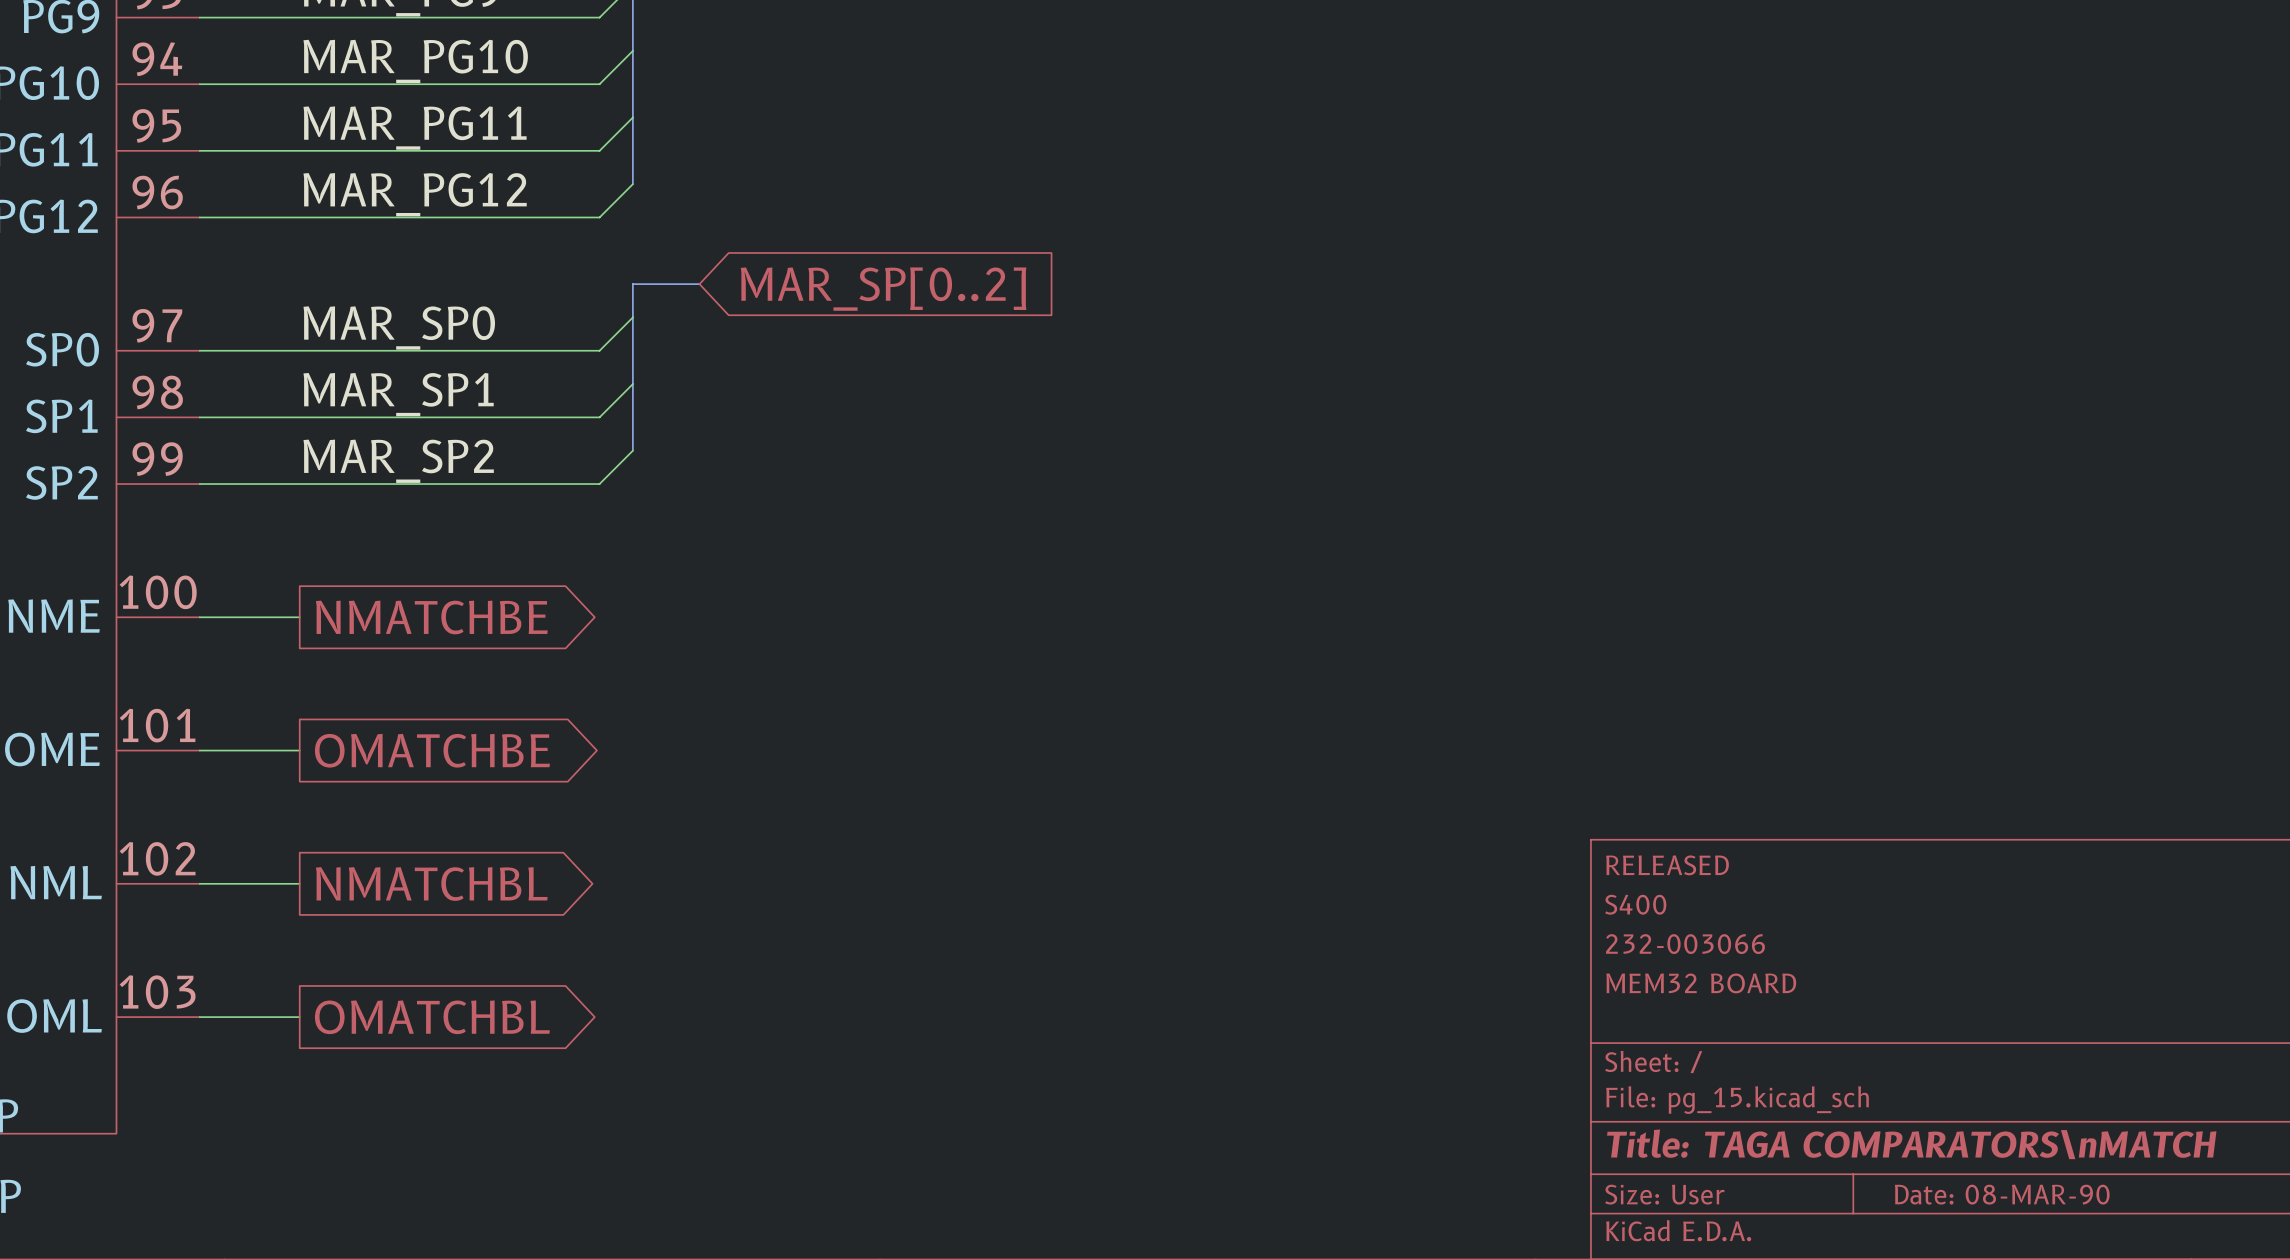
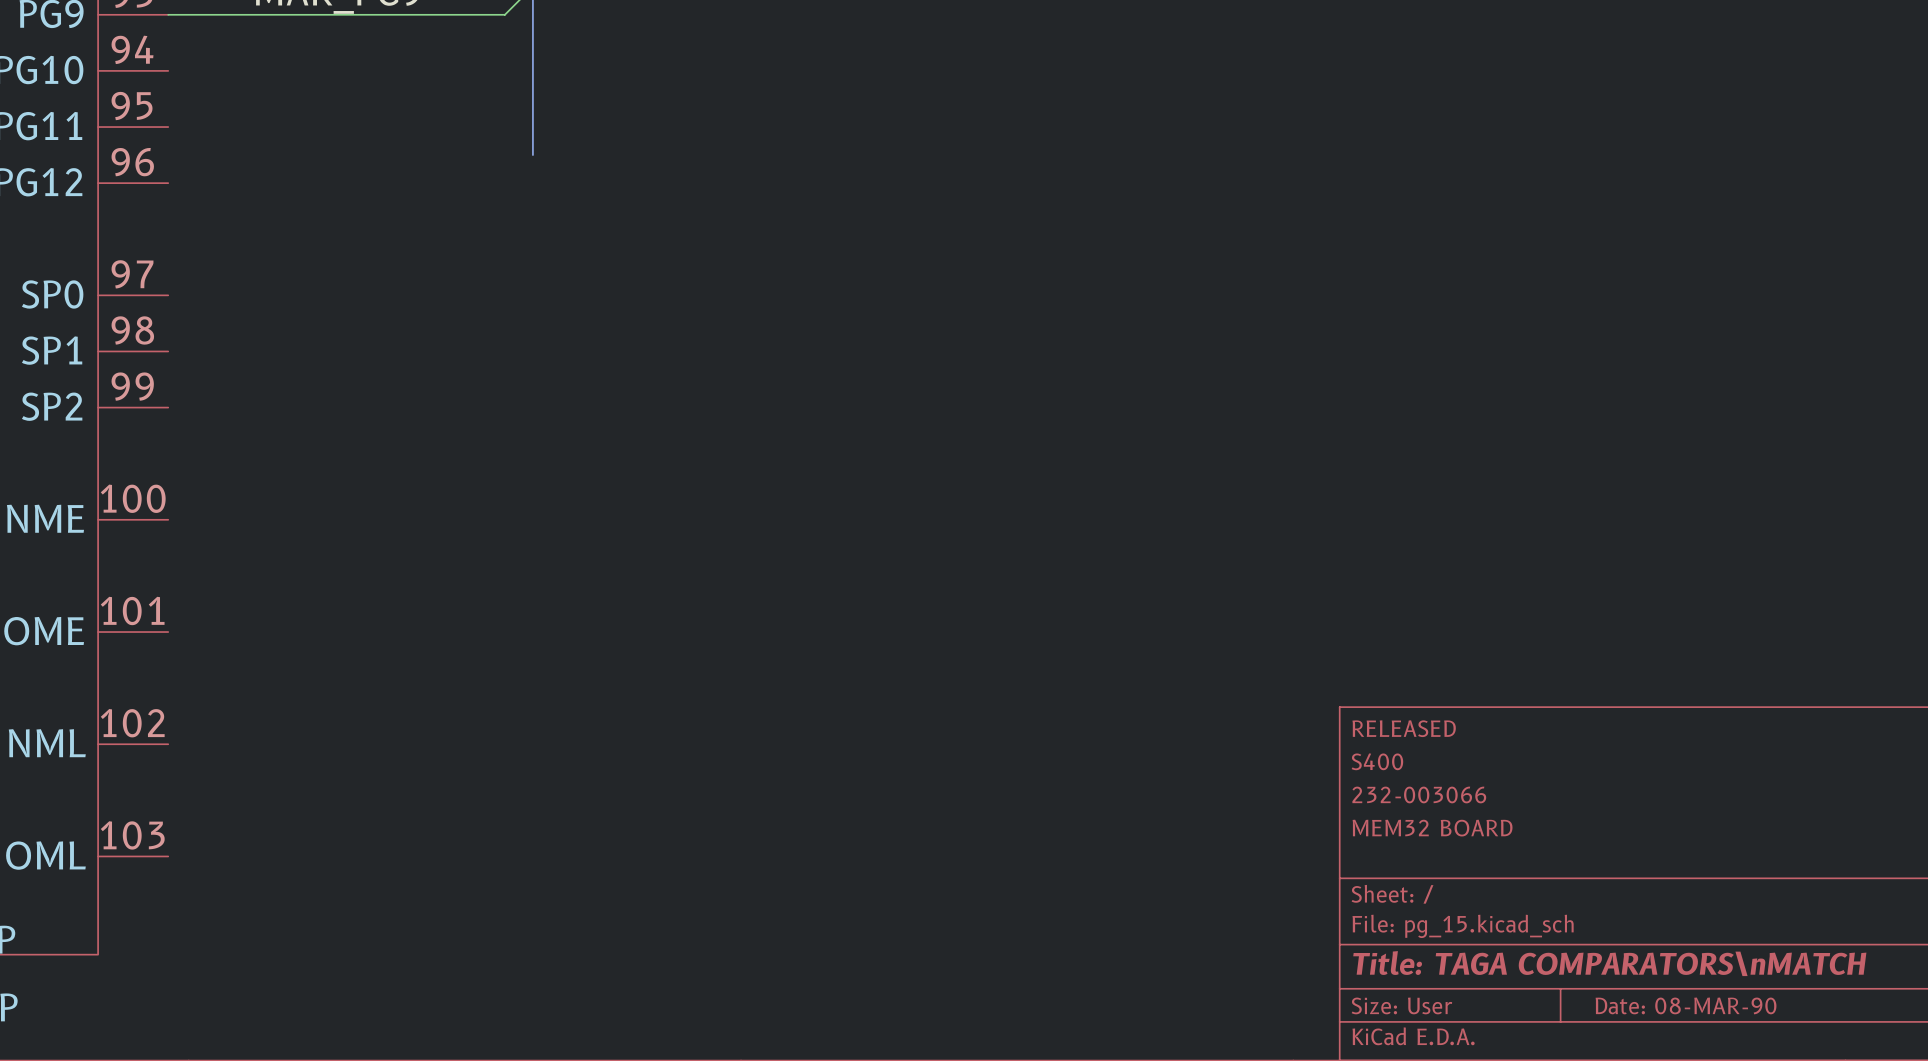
wire: (632, 50) (599, 84) (199, 84) -> none
label: MAR_PG10 (415, 61) -> none
wire: (632, 117) (599, 150) (199, 150) -> none
label: MAR_PG11 (415, 128) -> none
wire: (632, 184) (599, 217) (199, 217) -> none
label: MAR_PG12 (415, 194) -> none
bus: (699, 284) (632, 284) (632, 450) -> none
global label: MAR_SP[0..2] (883, 289) -> none
wire: (632, 317) (599, 350) (199, 350) -> none
label: MAR_SP0 (399, 328) -> none
wire: (632, 384) (599, 417) (199, 417) -> none
label: MAR_SP1 (398, 394) -> none
wire: (632, 450) (599, 484) (199, 484) -> none
label: MAR_SP2 (398, 461) -> none
wire: (199, 617) (299, 617) -> none
global label: NMATCHBE (431, 617) -> none
wire: (199, 750) (299, 750) -> none
global label: OMATCHBE (432, 750) -> none
wire: (199, 883) (299, 883) -> none
global label: NMATCHBL (431, 884) -> none
wire: (199, 1017) (299, 1017) -> none
global label: OMATCHBL (432, 1017) -> none

